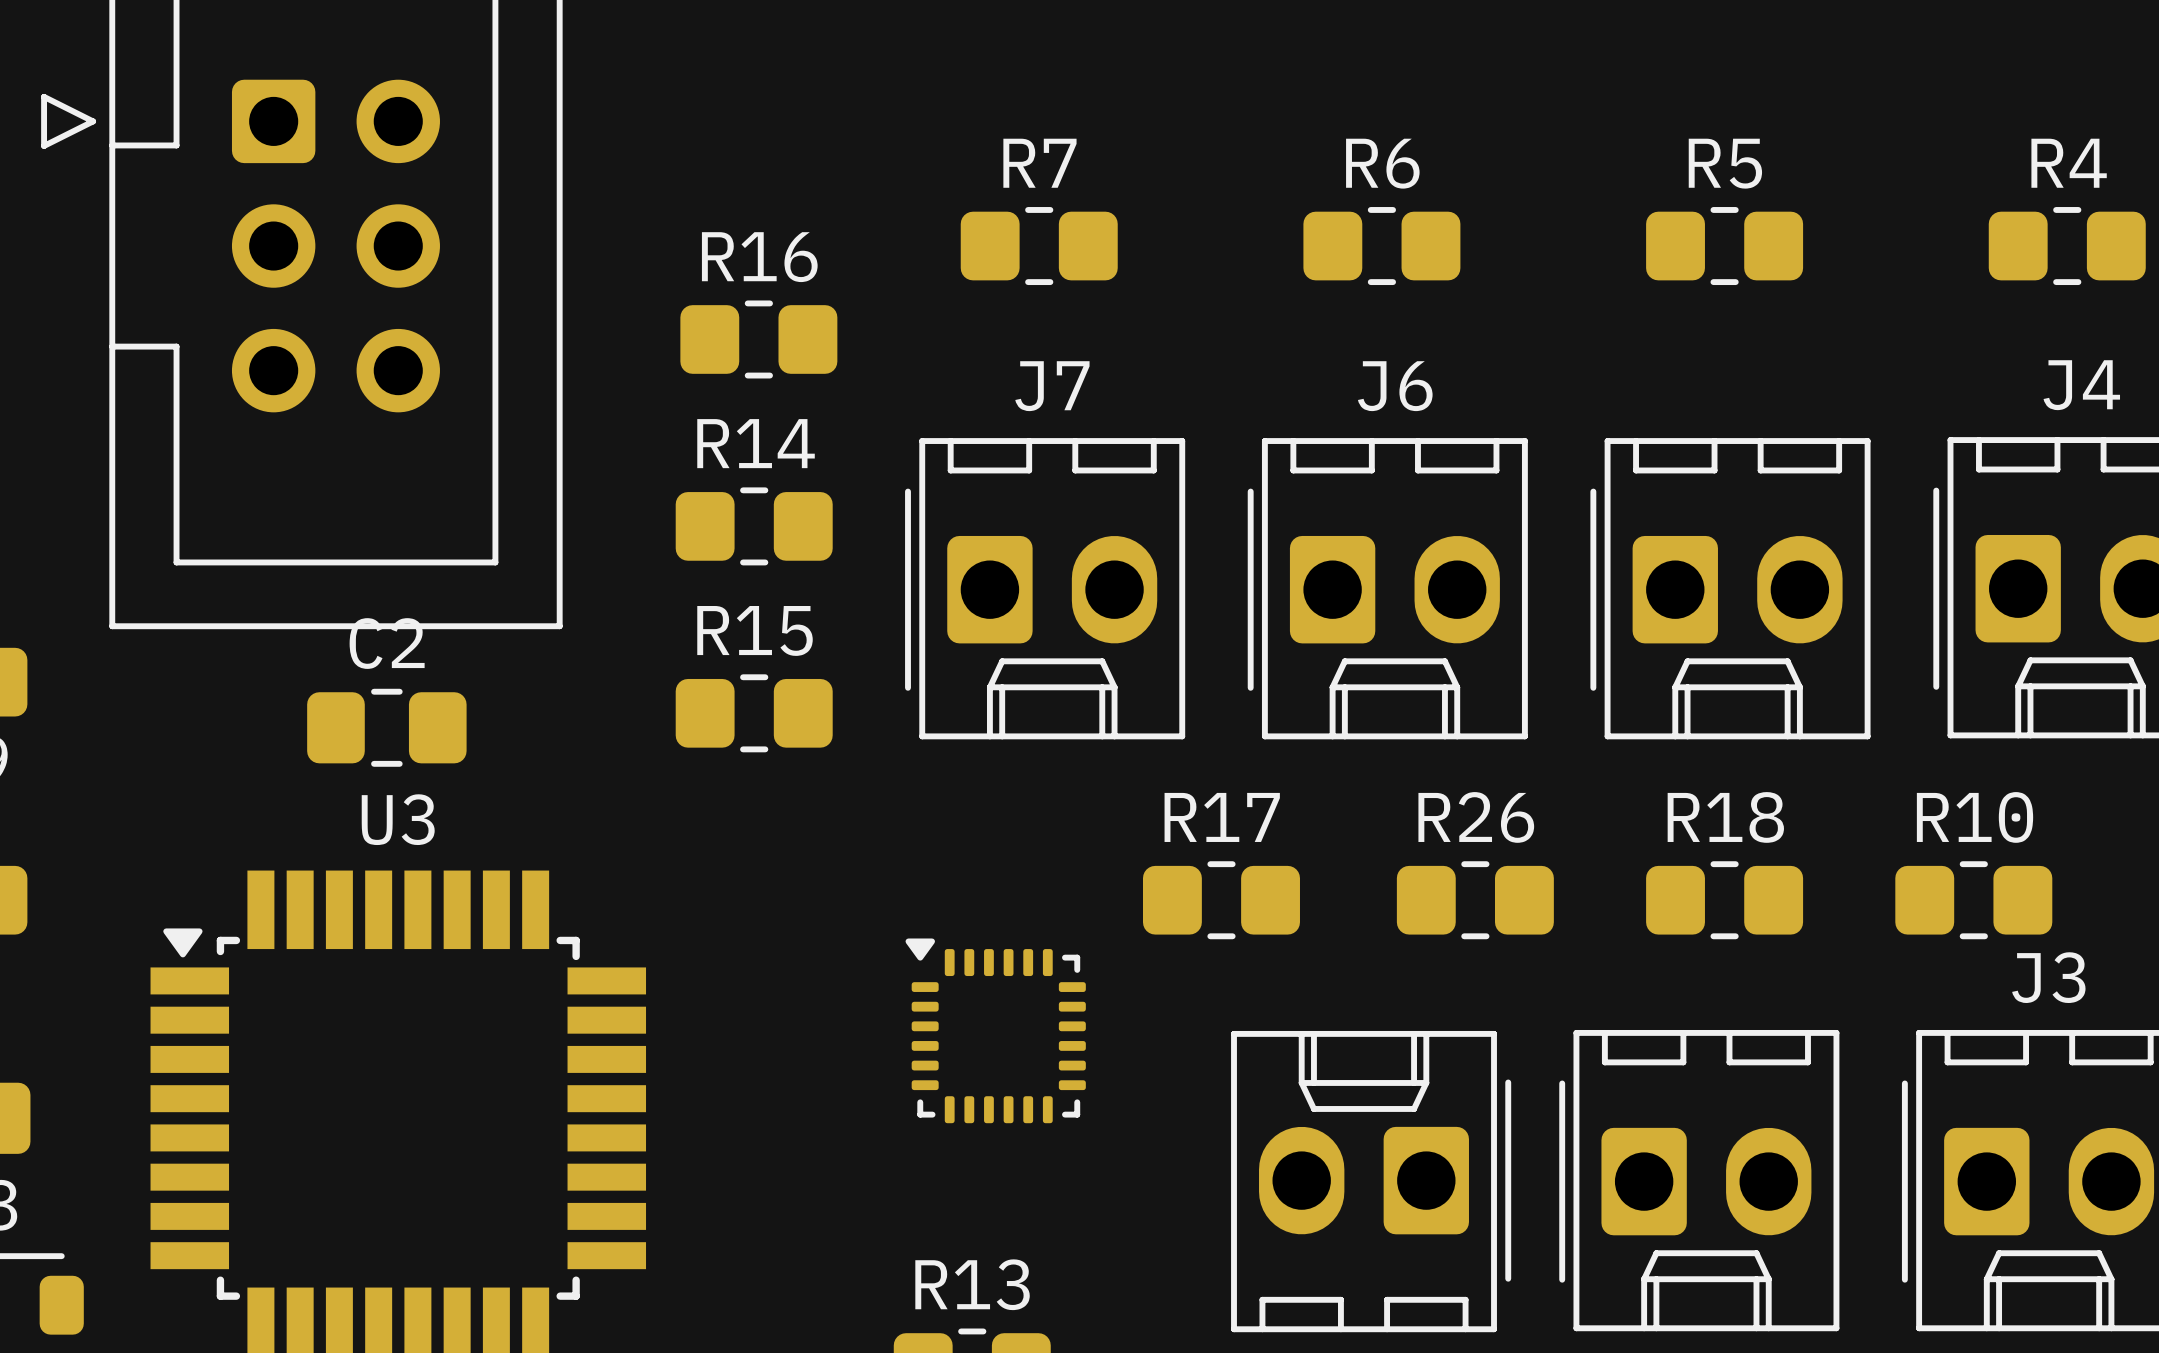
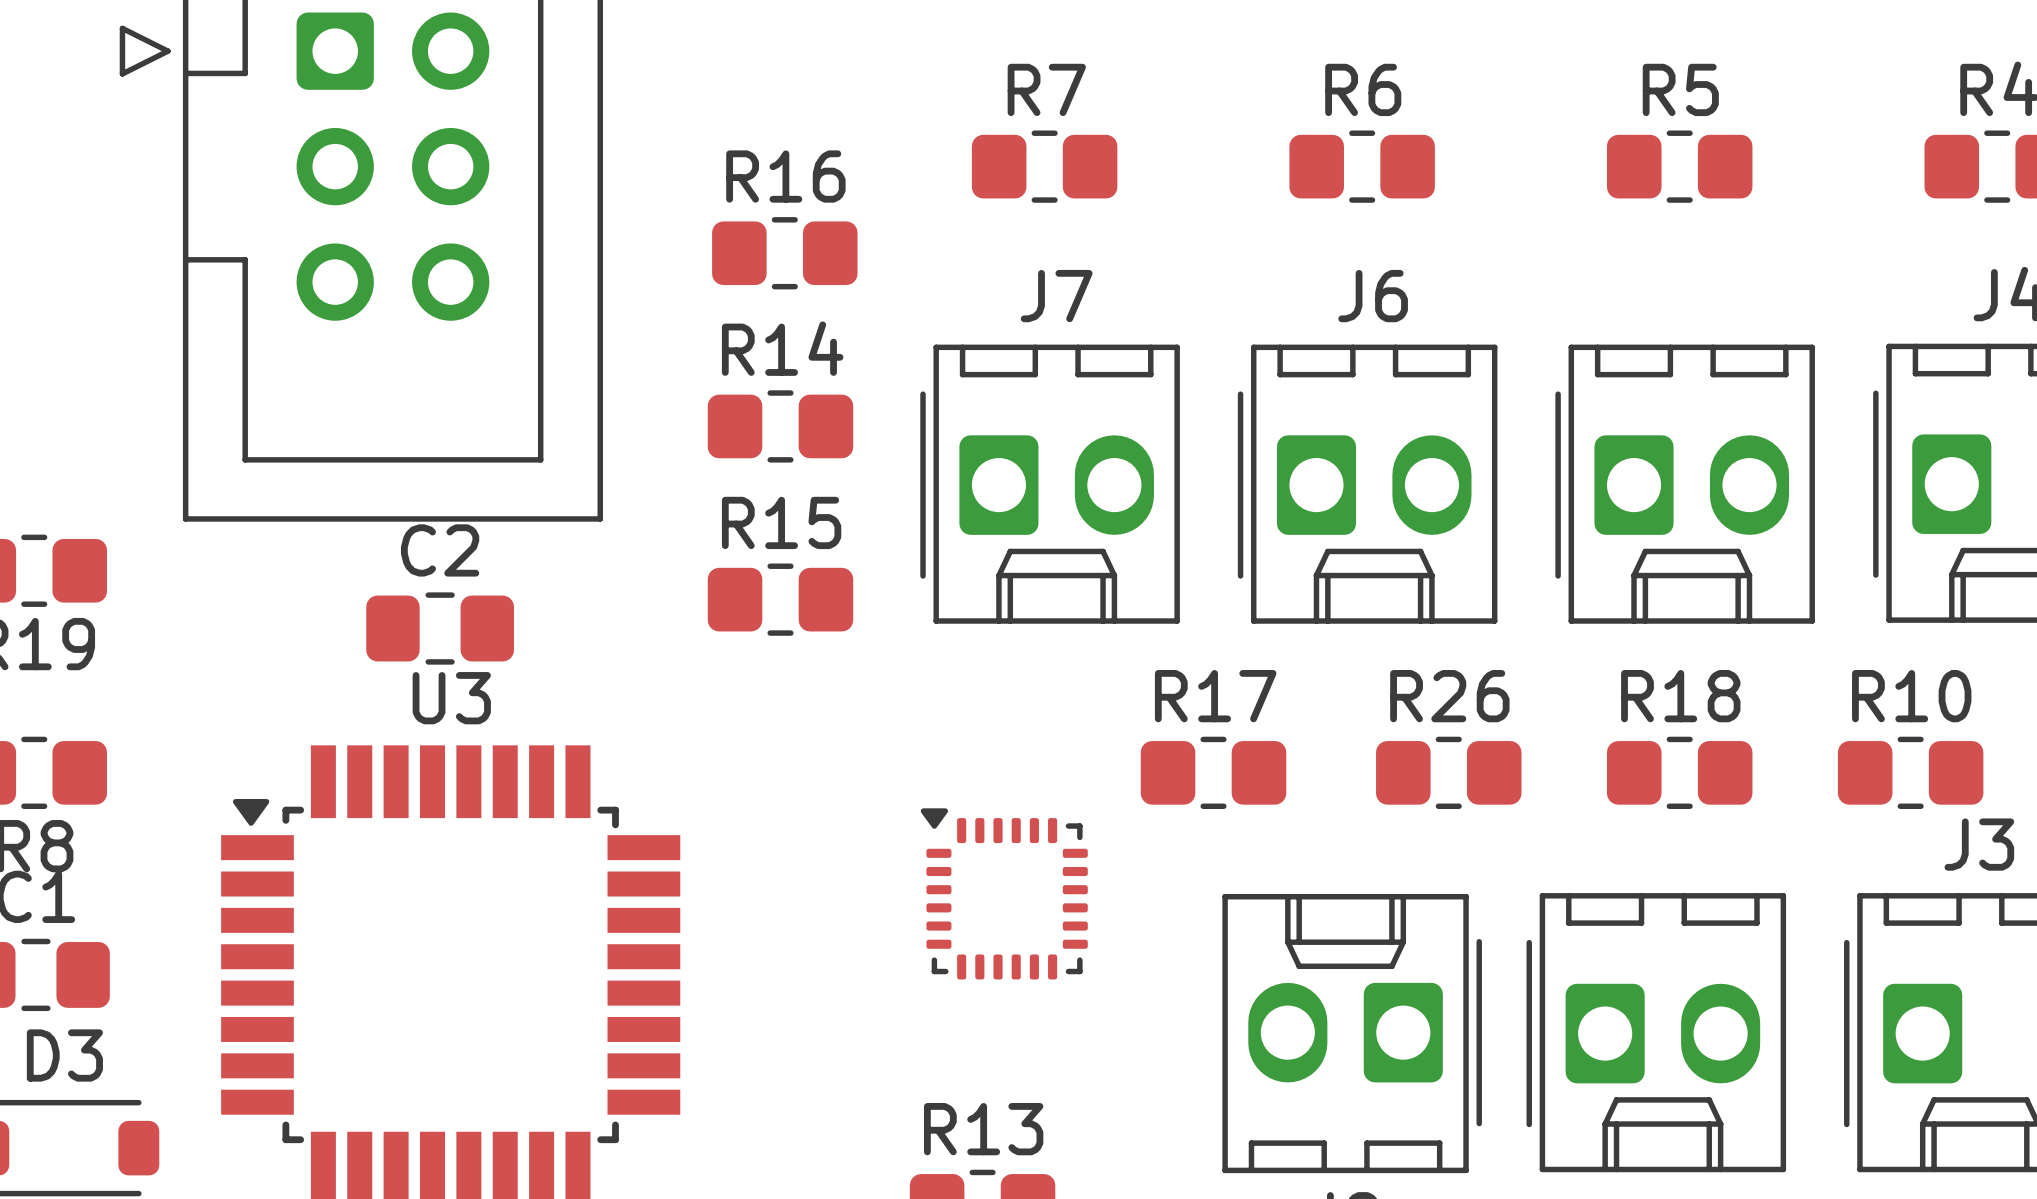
C2 position: (386, 727) -> (440, 628)

